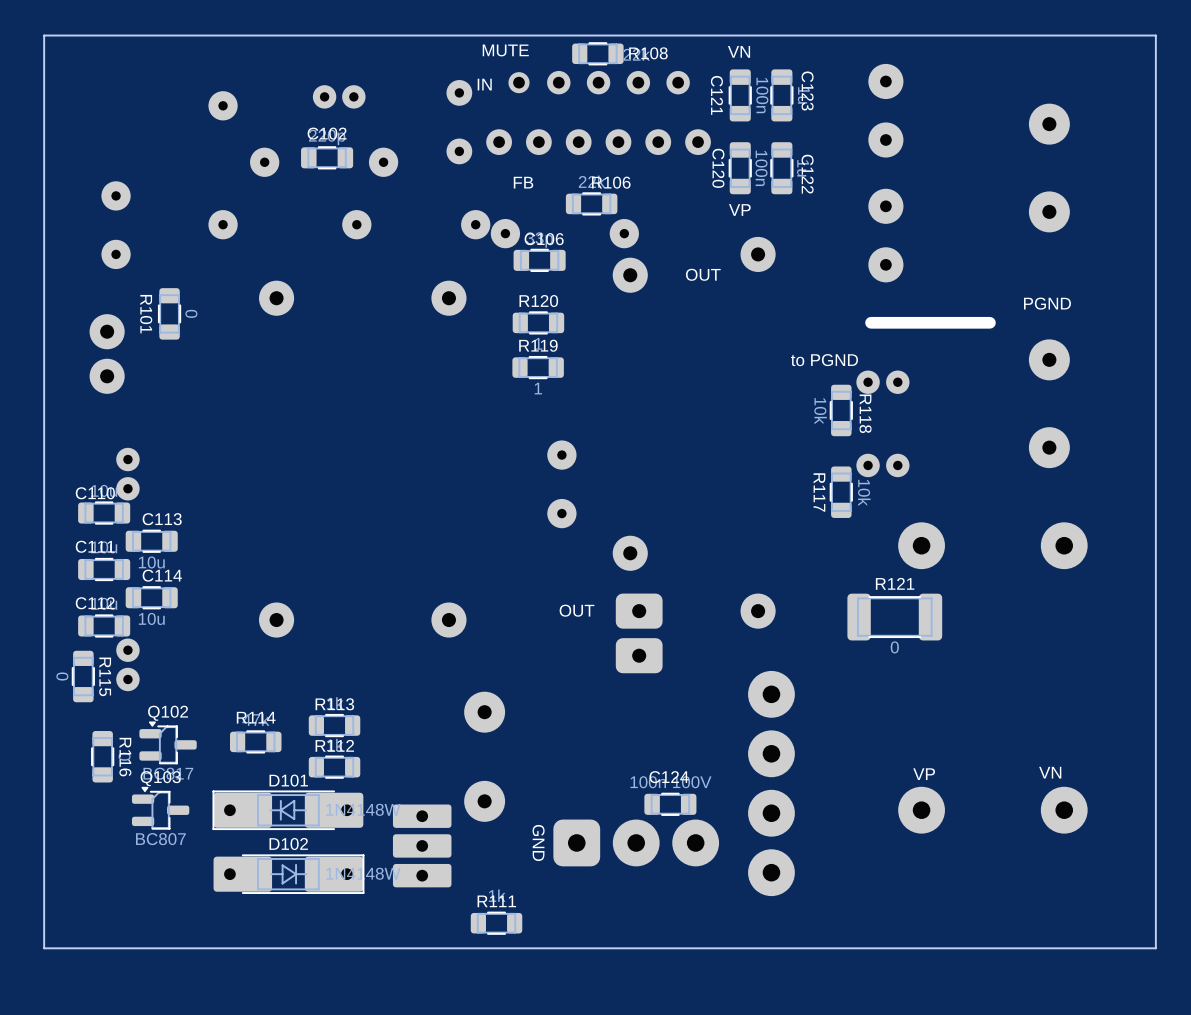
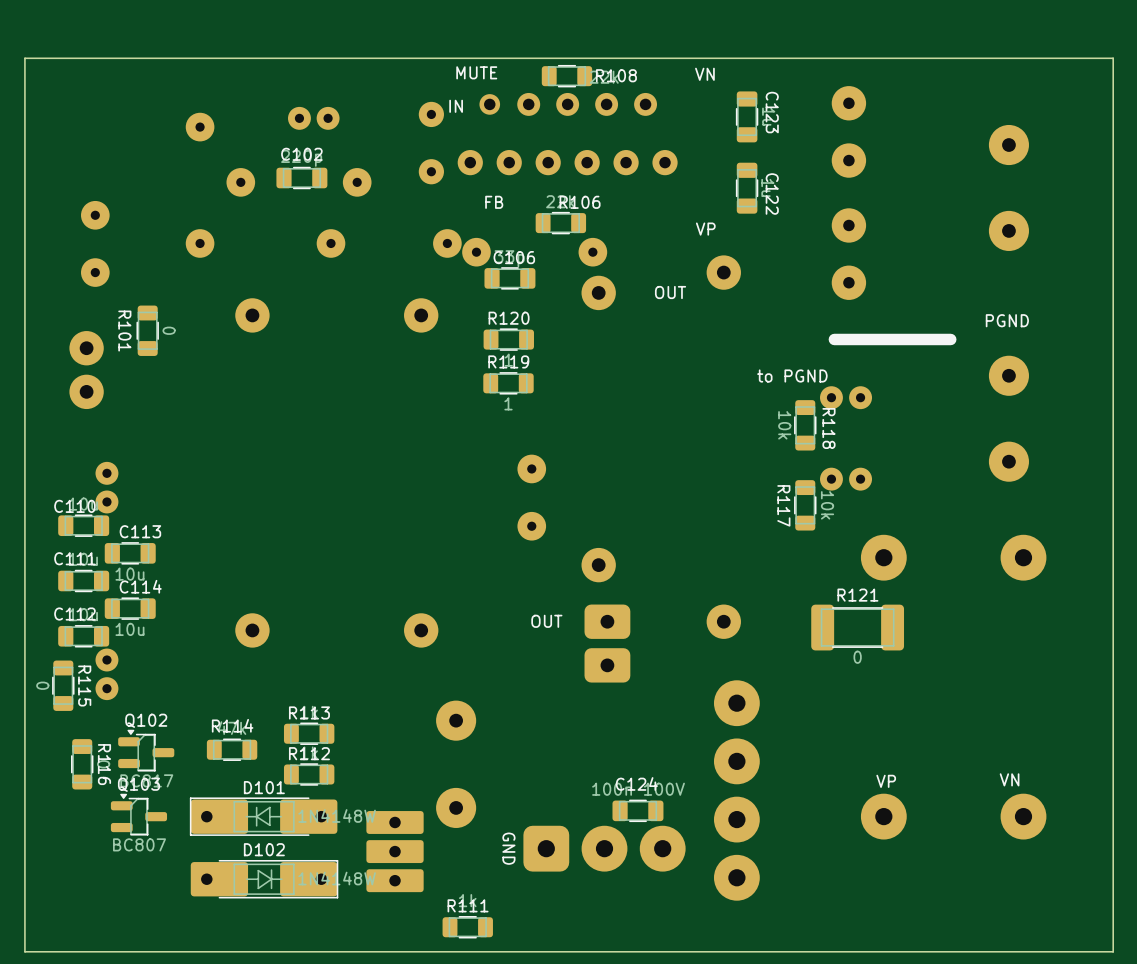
C121: 100n (740, 95) -> none
C120: 100n (740, 168) -> none

